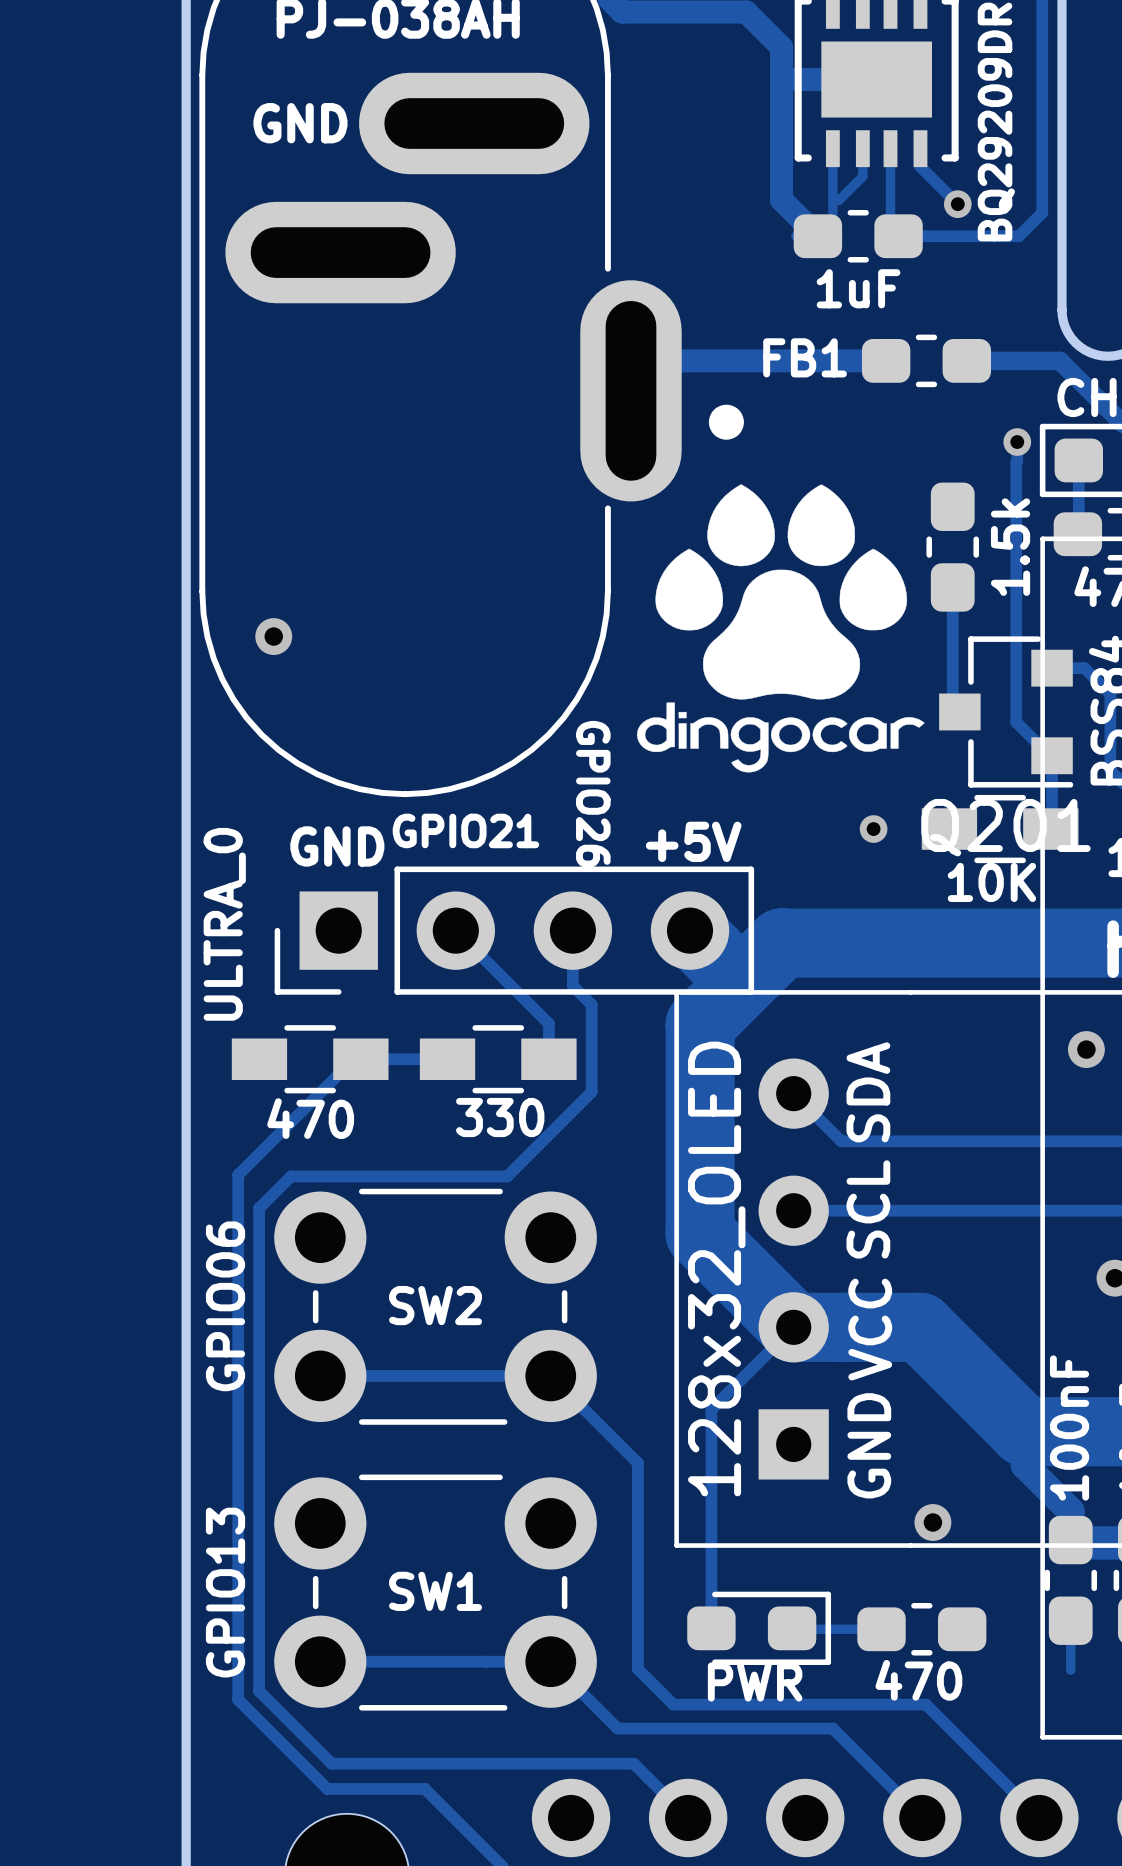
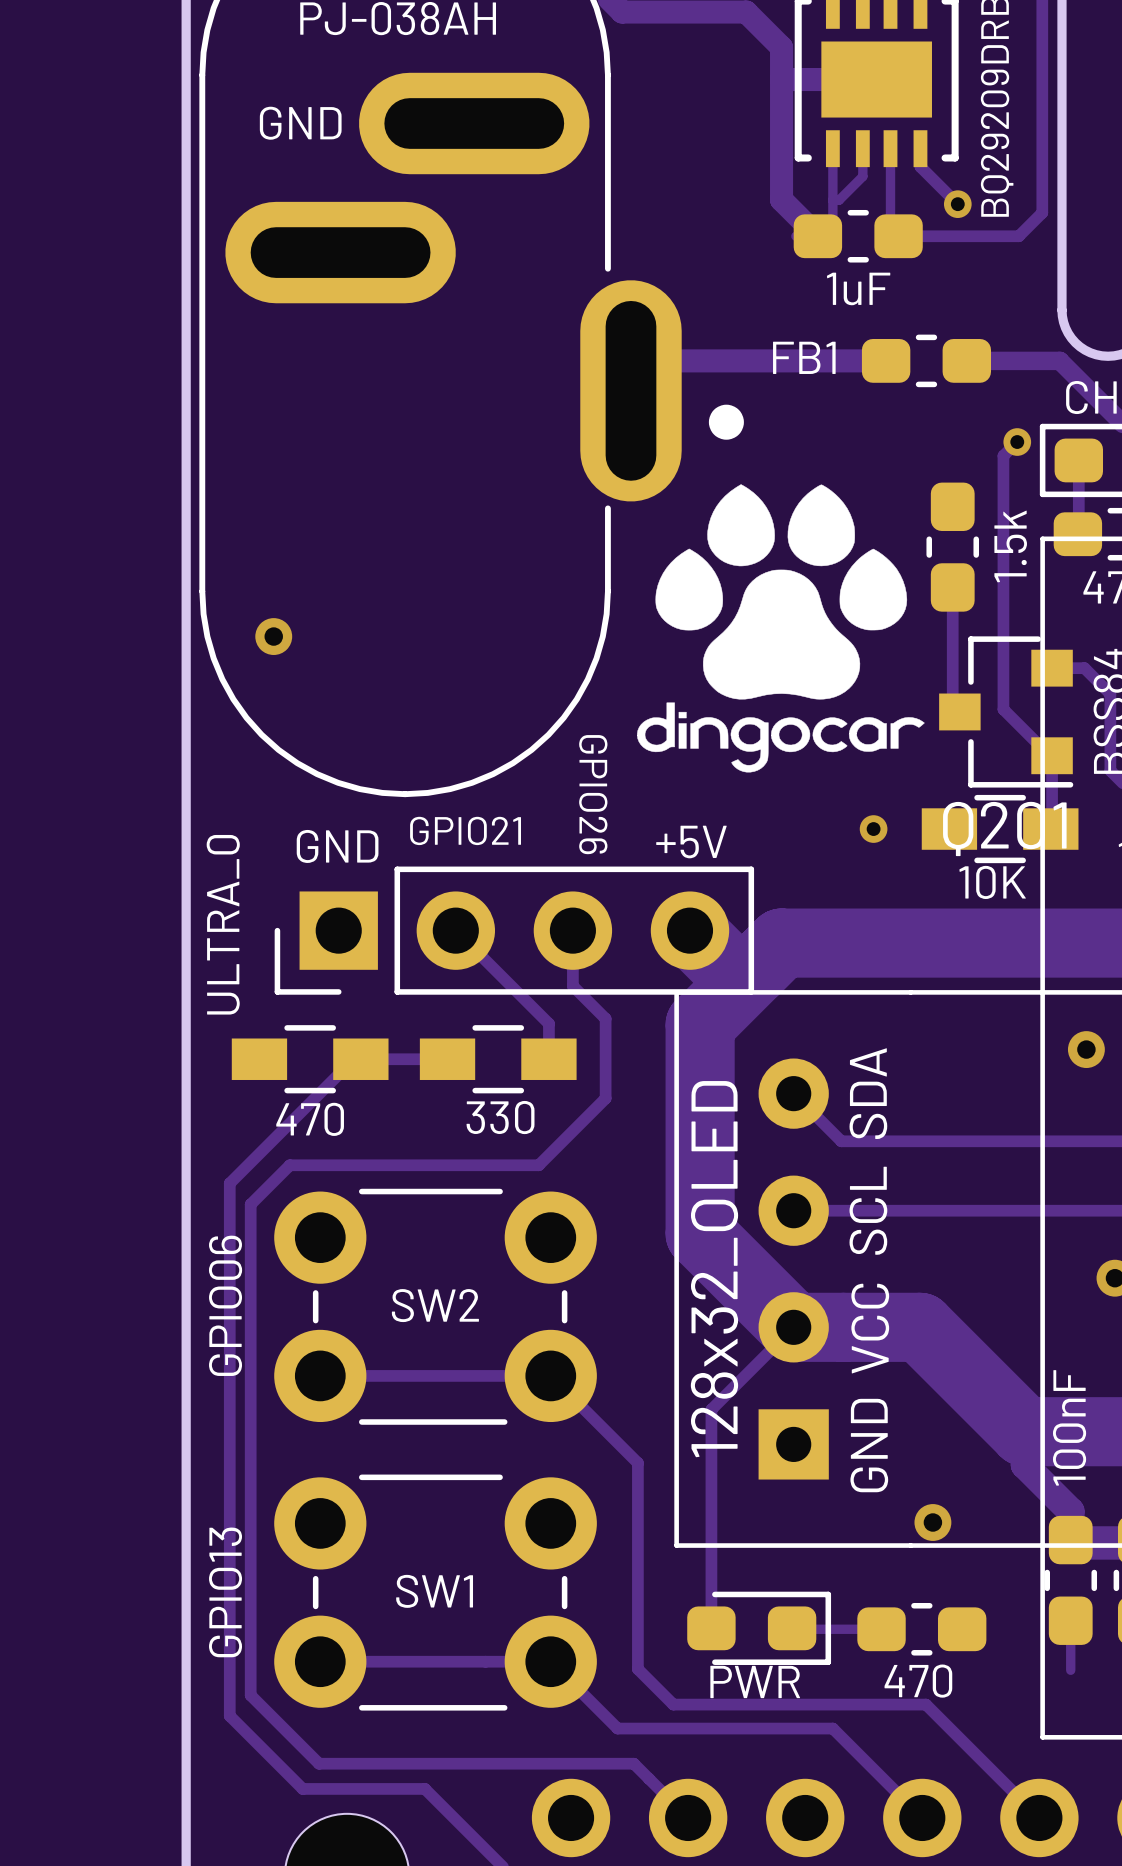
track: (1017, 442) (1016, 722) -> (1017, 442) (1003, 455) (1003, 709) (1016, 722)
track: (591, 1004) (591, 1092) (507, 1176) (290, 1176) (259, 1208) (259, 1691) (331, 1763) -> (591, 1004) (605, 1018) (605, 1098) (538, 1165) (289, 1165) (250, 1204) (250, 1695) (319, 1763) (331, 1763)
track: (238, 1174) (238, 1699) (327, 1788) -> (238, 1174) (229, 1183) (229, 1715) (302, 1788) (327, 1788)

